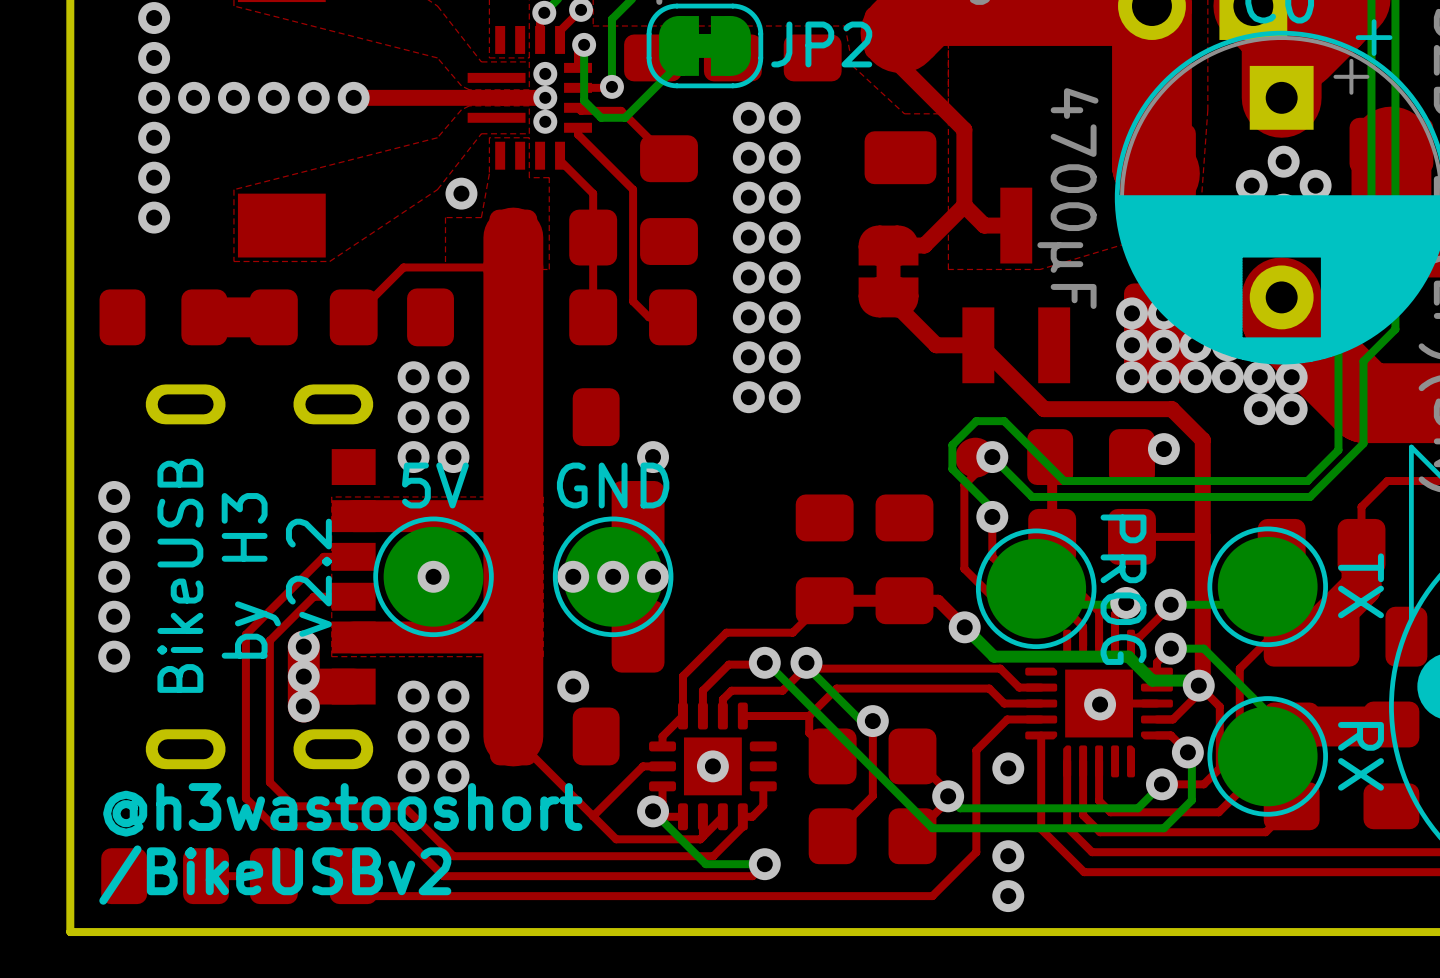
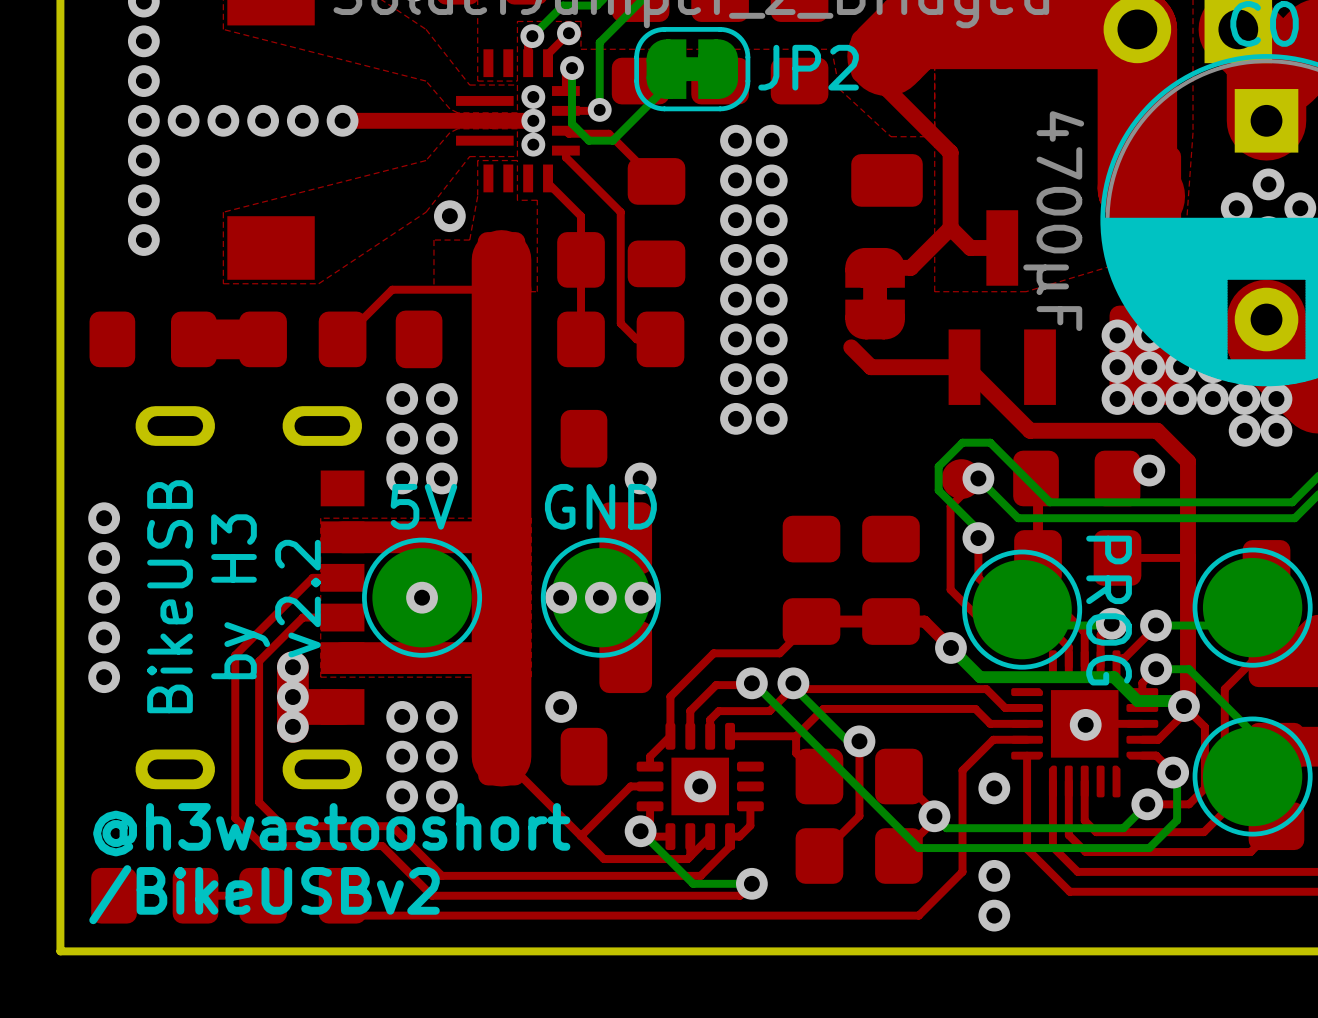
top track: (888, 297) (936, 345) -> (851, 347) (871, 367) (922, 367)

